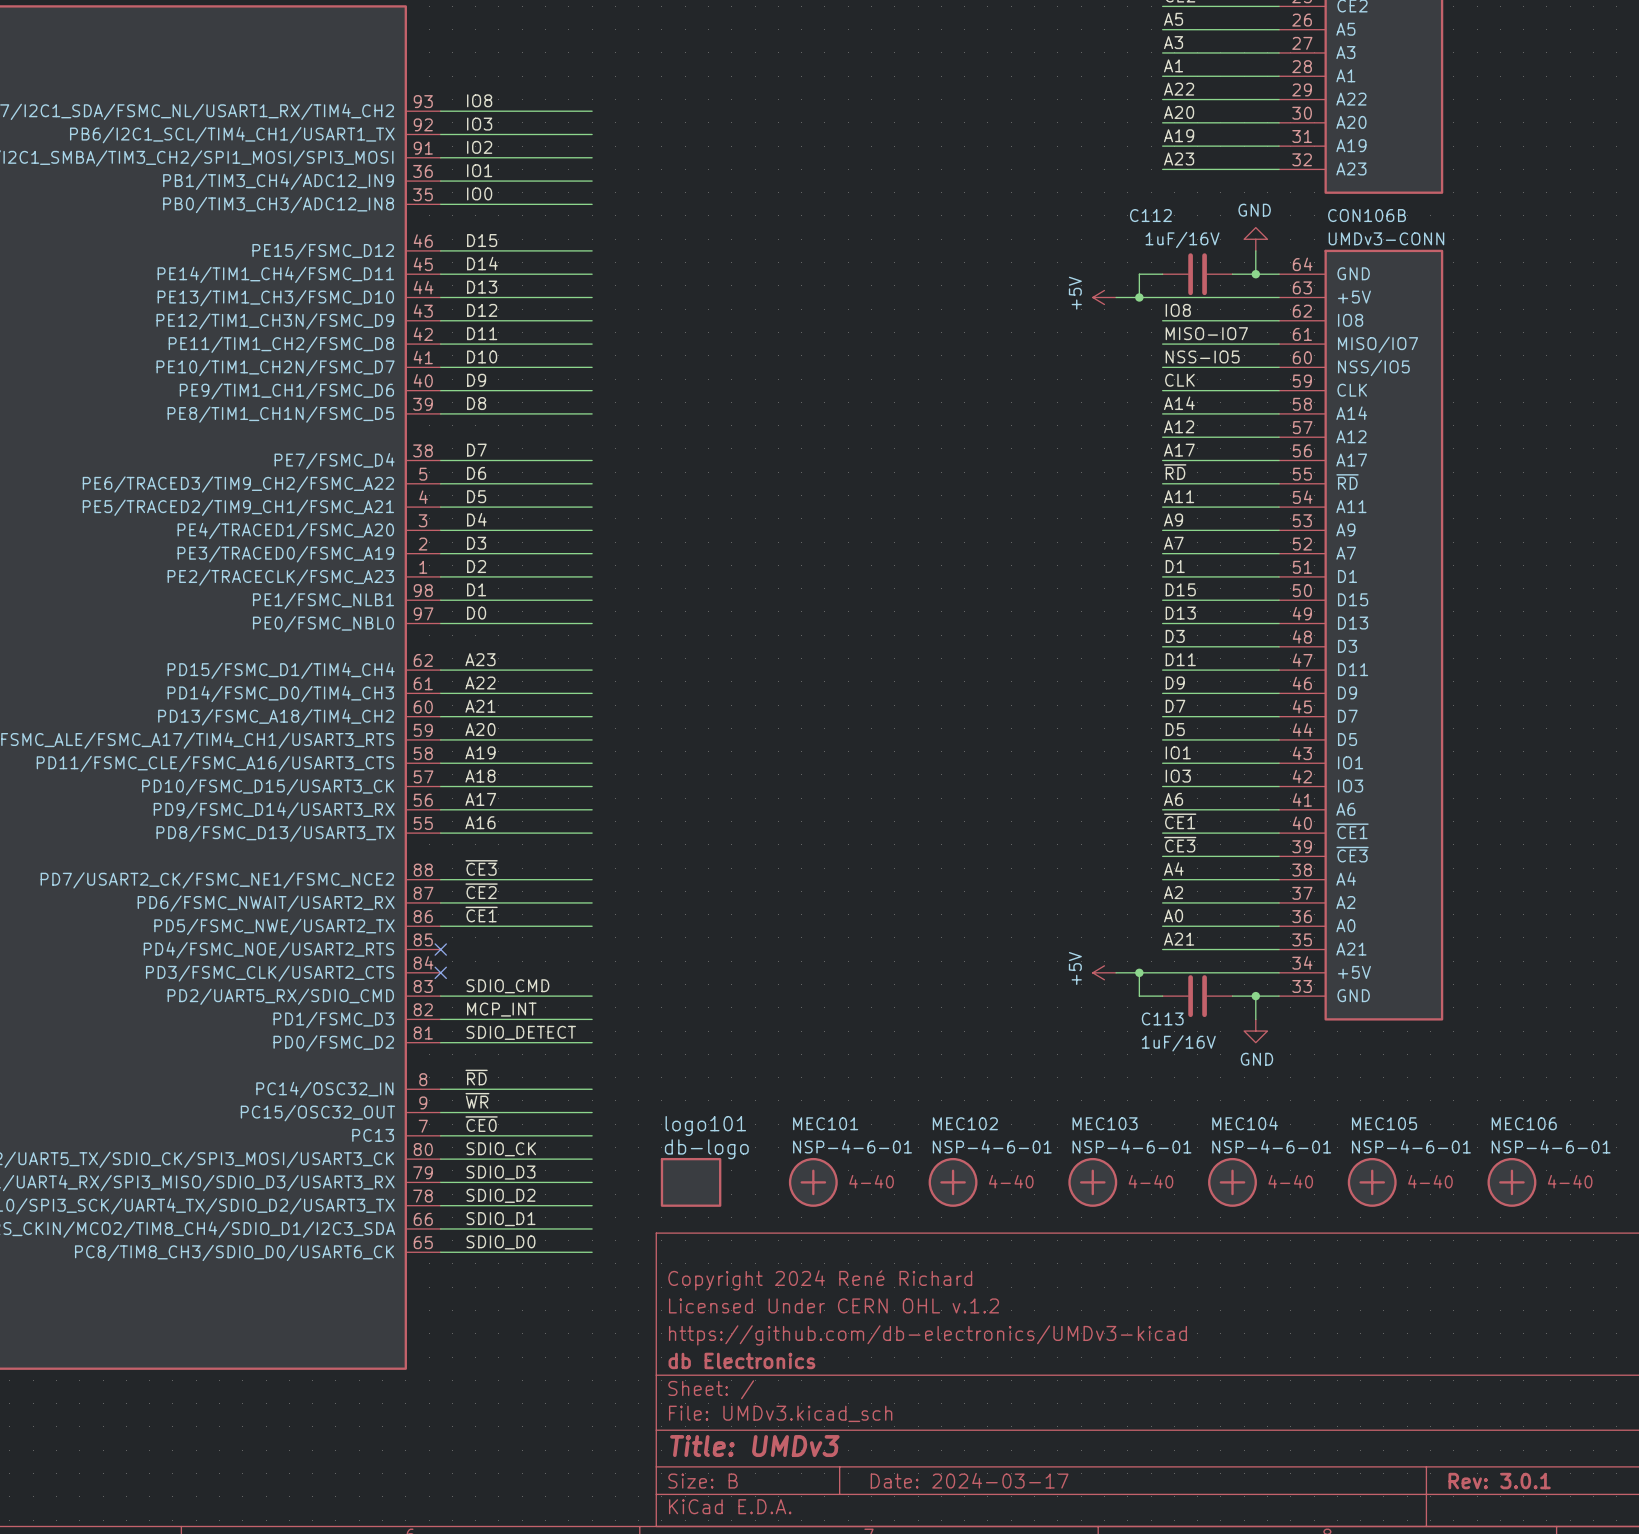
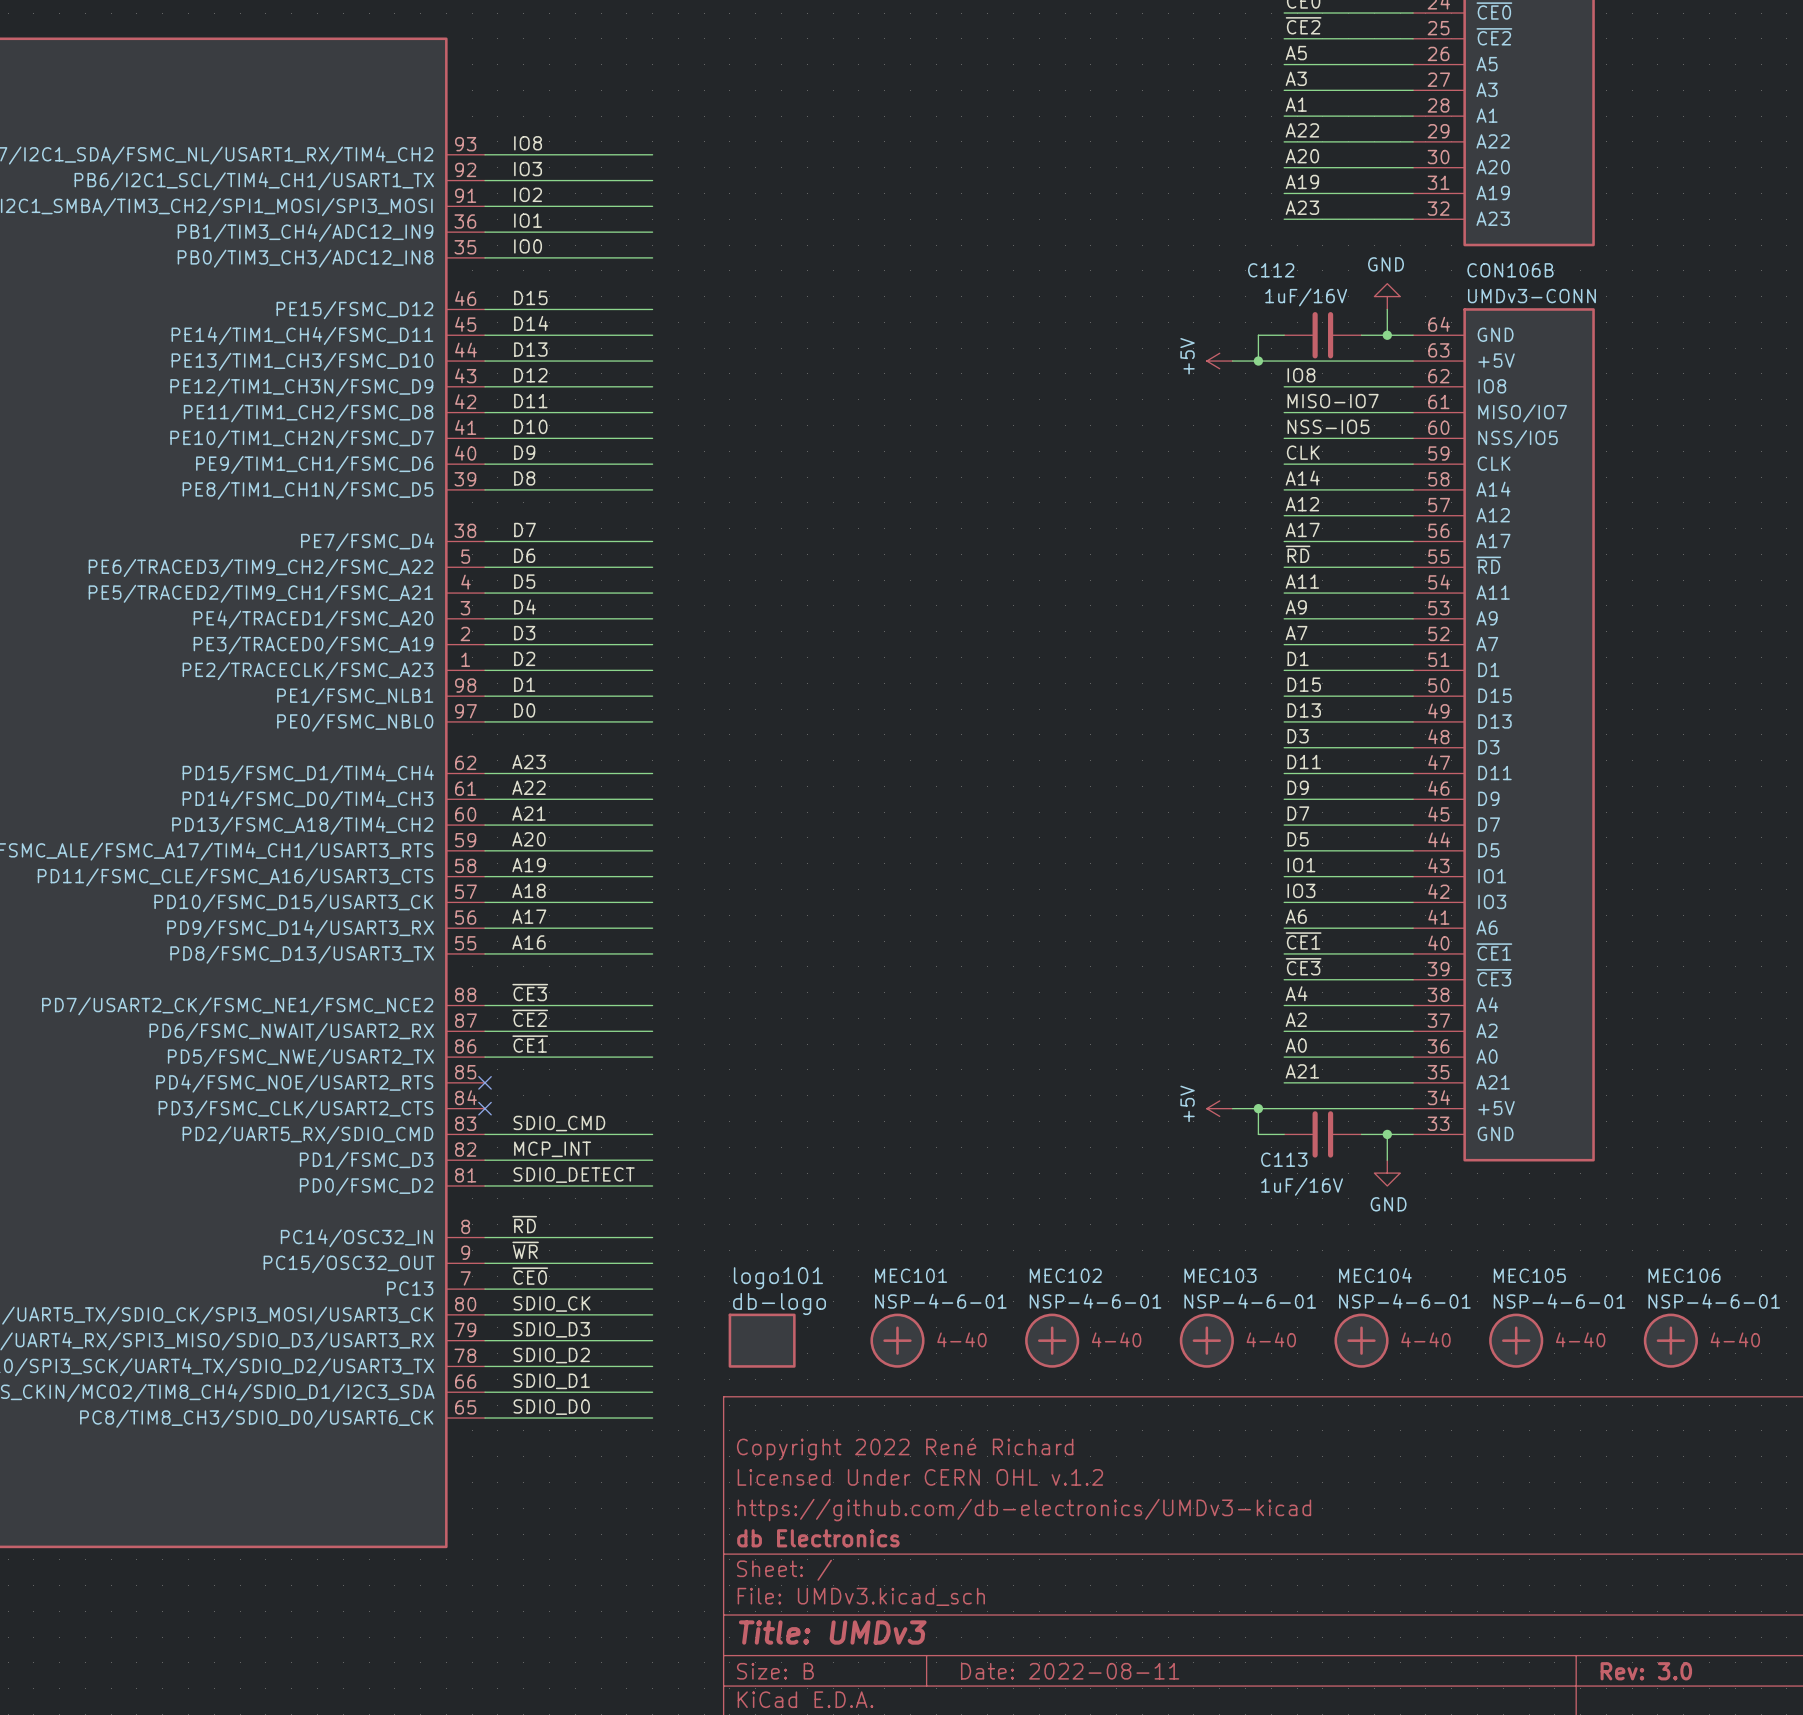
title block: Copyright 2024 René Richard (820, 1280) -> Copyright 2022 René Richard (905, 1449)
title block: Date: 2024-03-17 (969, 1480) -> Date: 2022-08-11 (1070, 1671)
title block: Rev: 3.0.1 (1499, 1481) -> Rev: 3.0 (1646, 1671)

